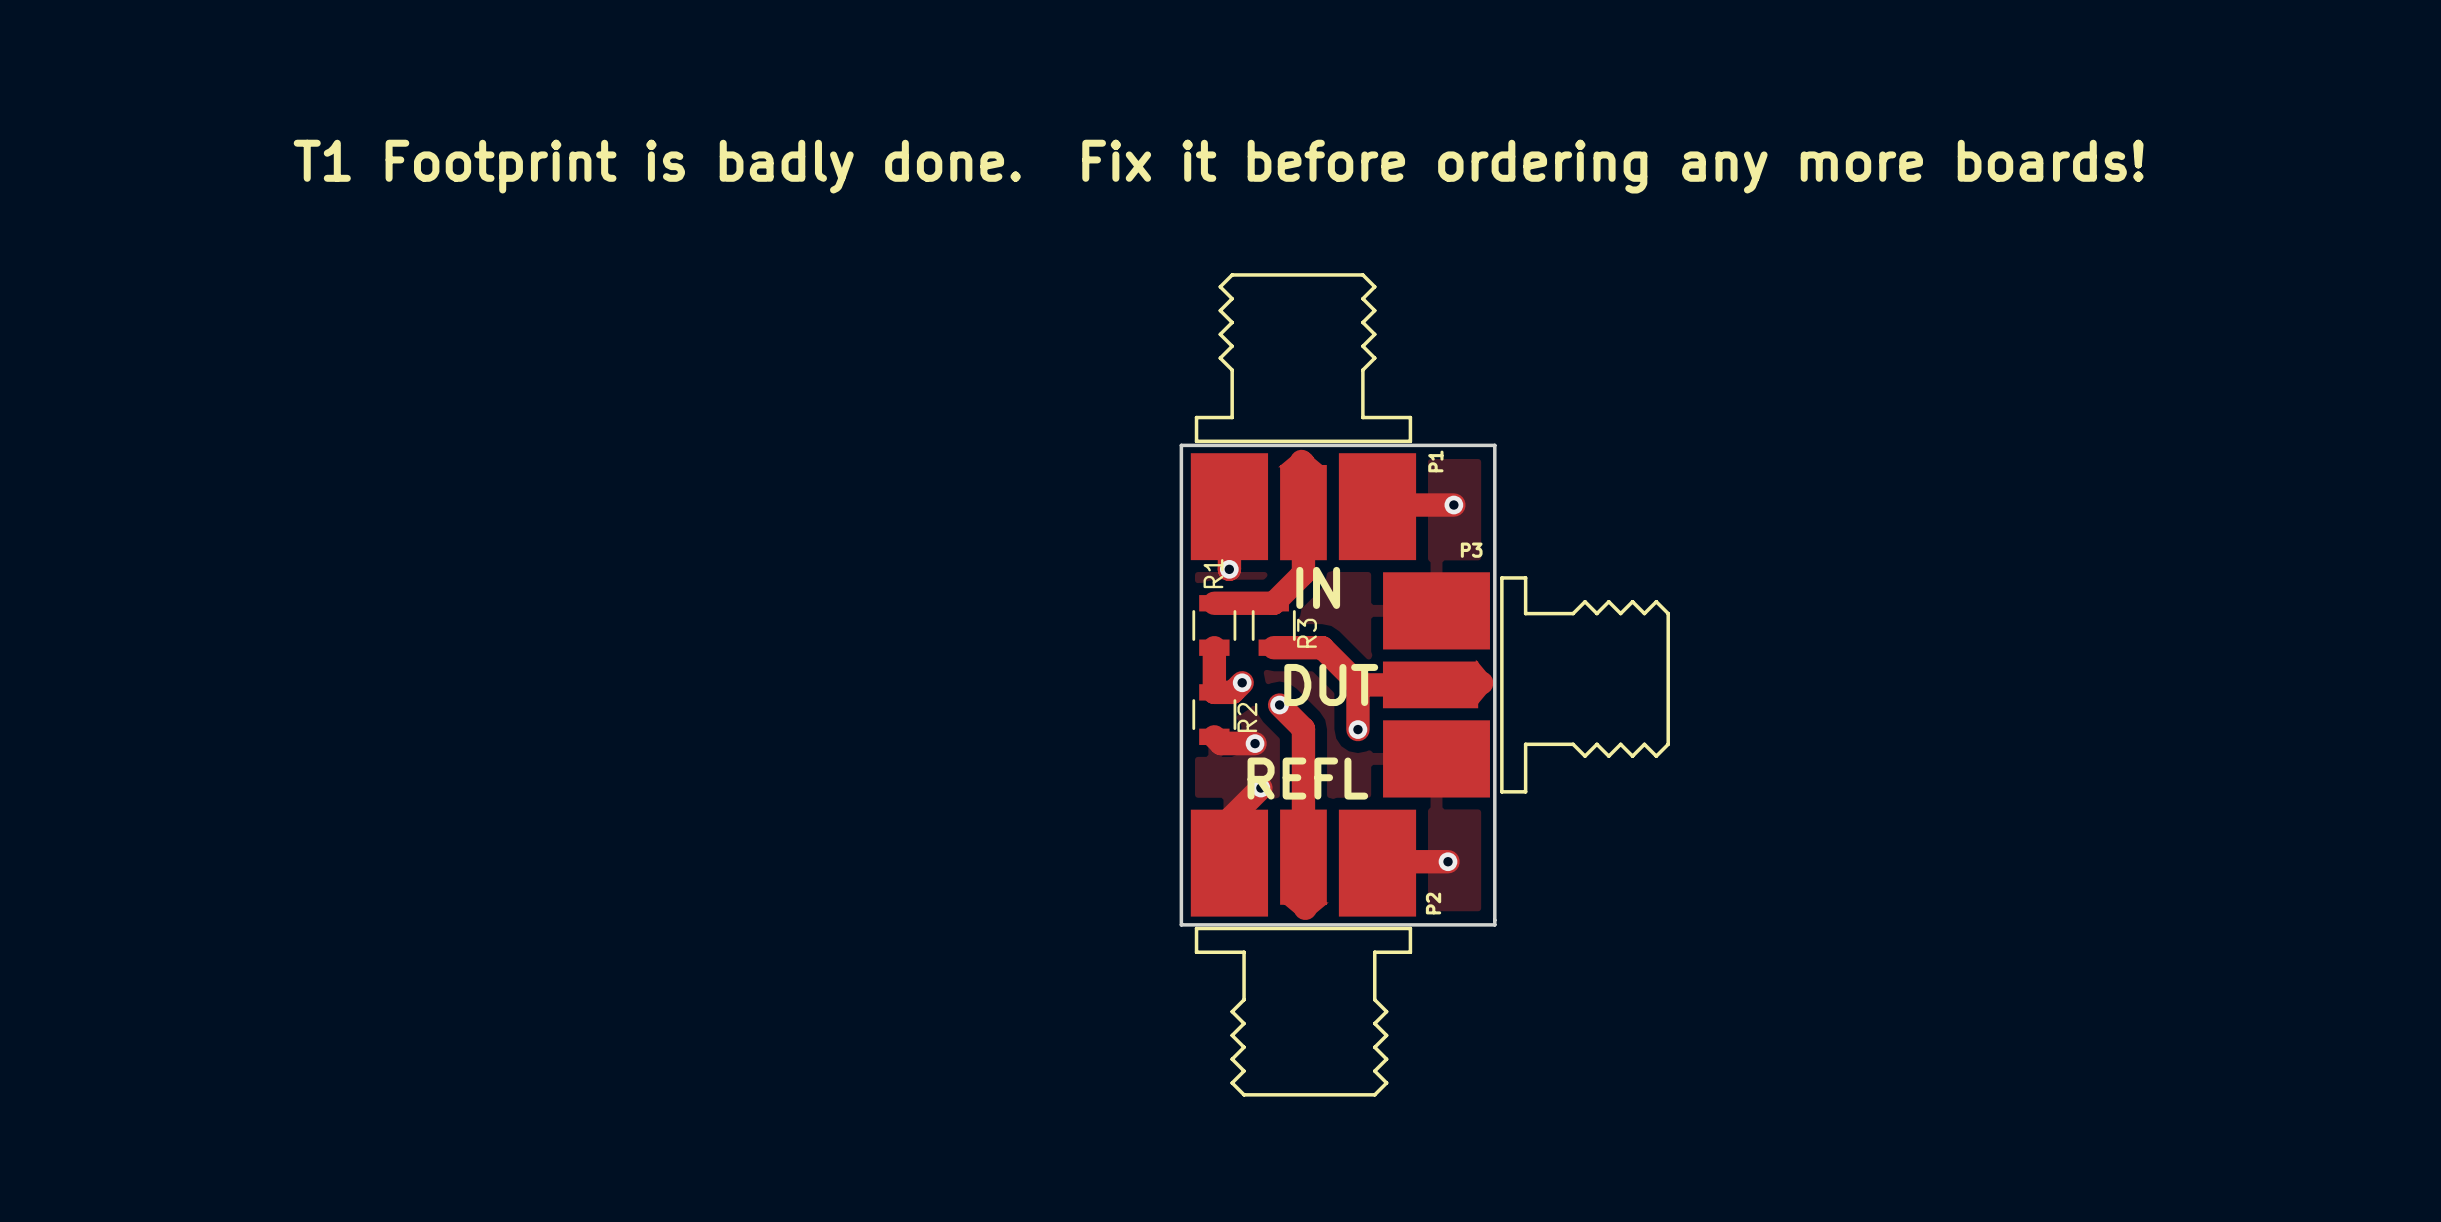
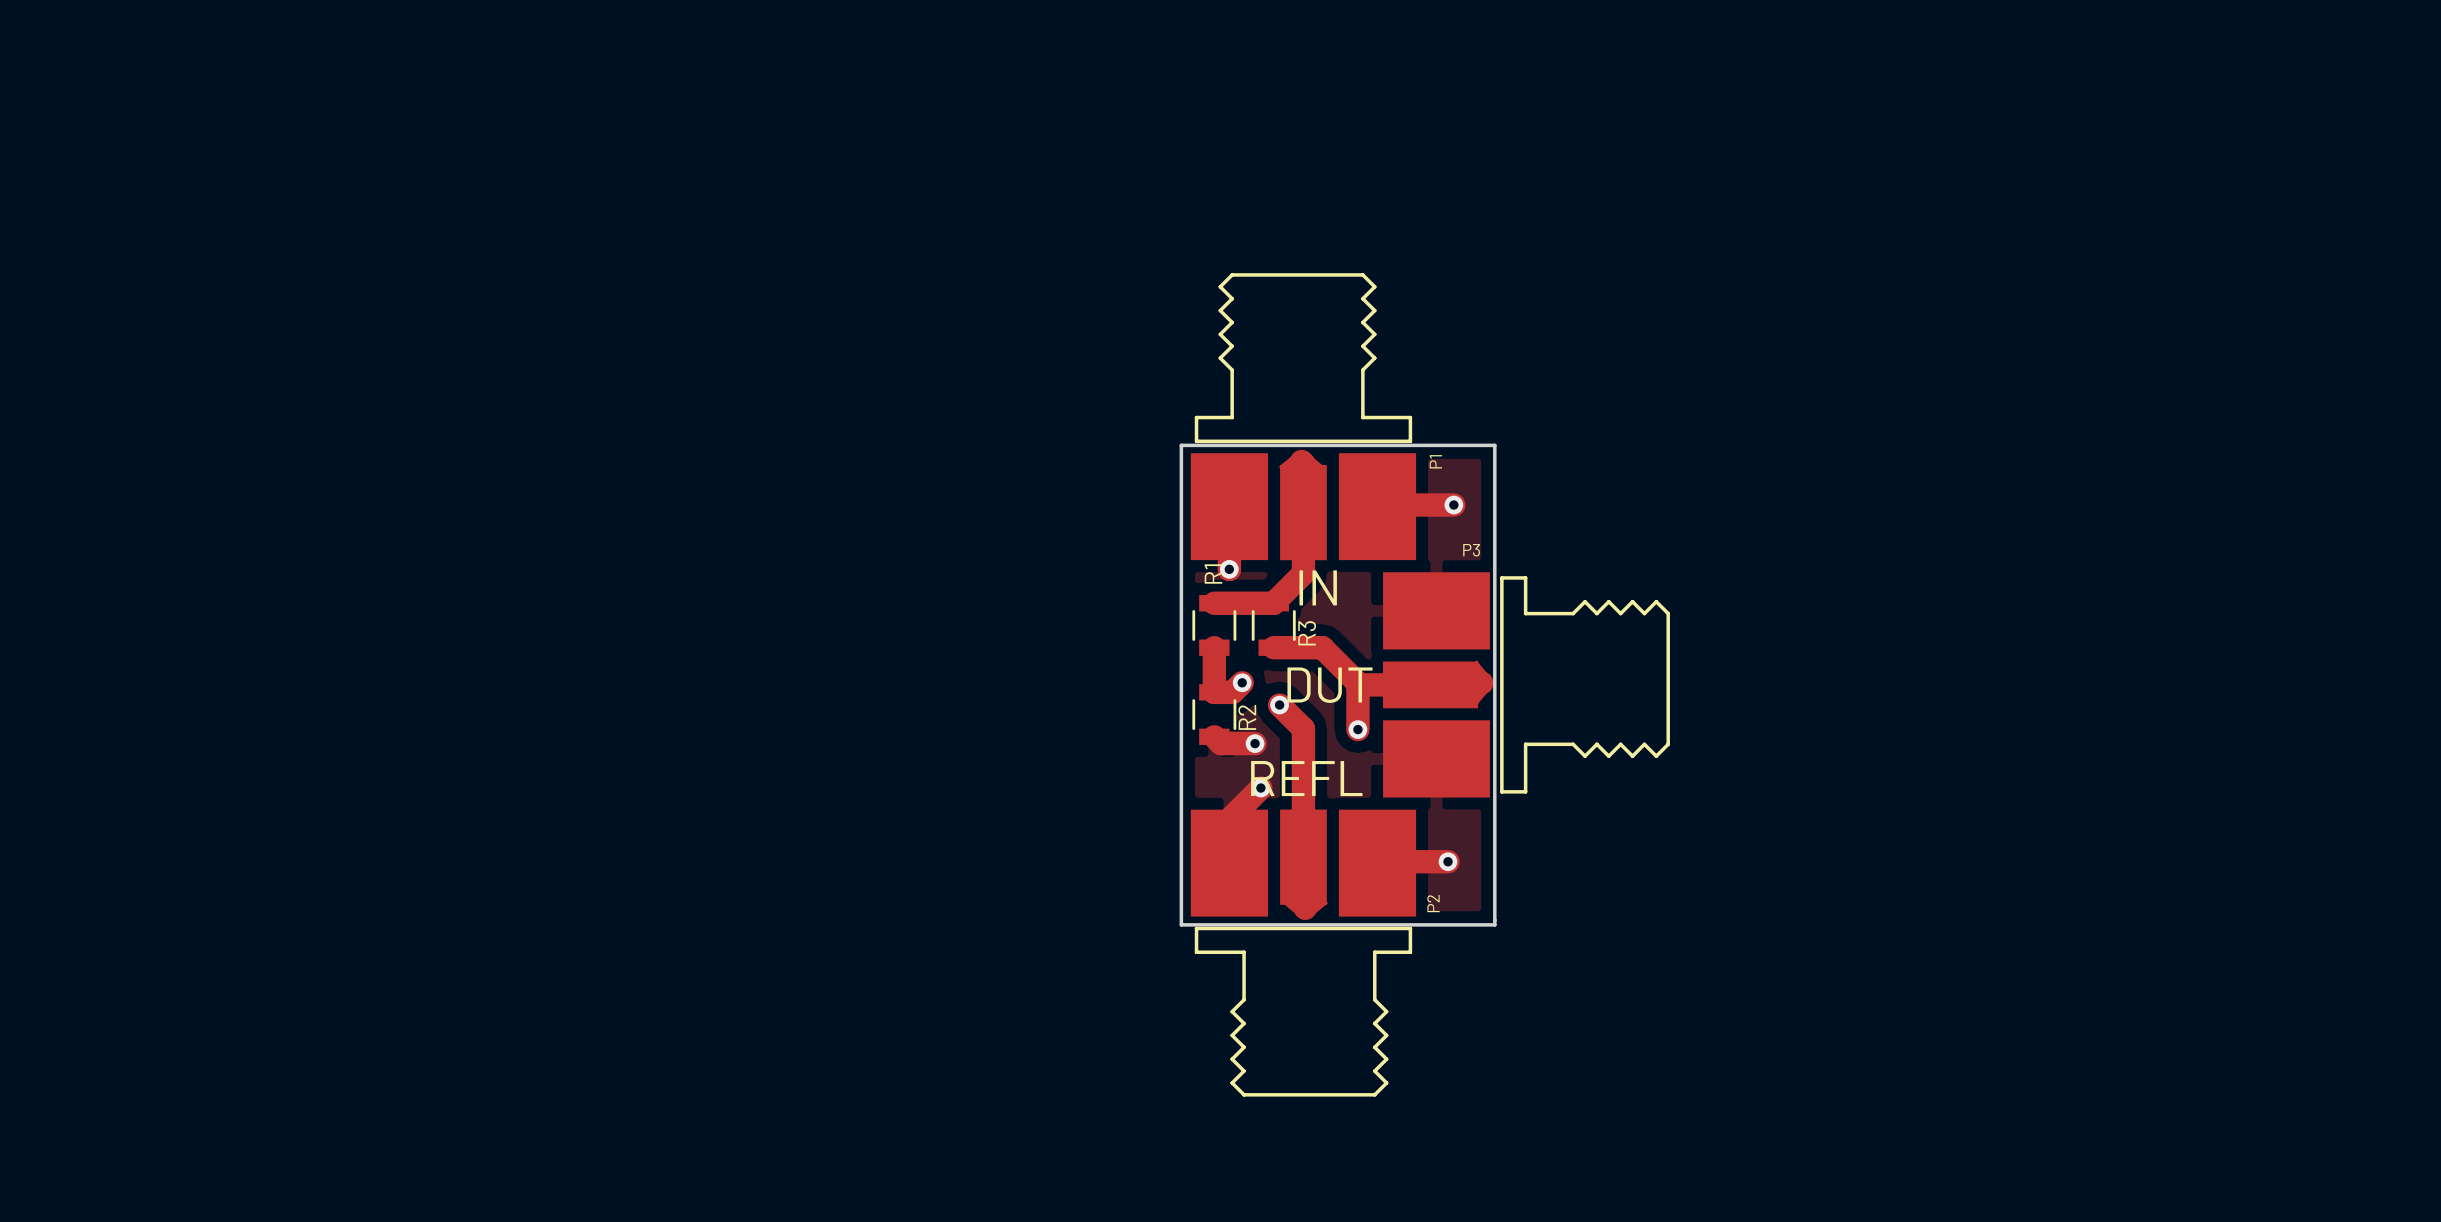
text: T1 Footprint is badly done. Fix it before ordering any more boards! (1218, 166) -> none

